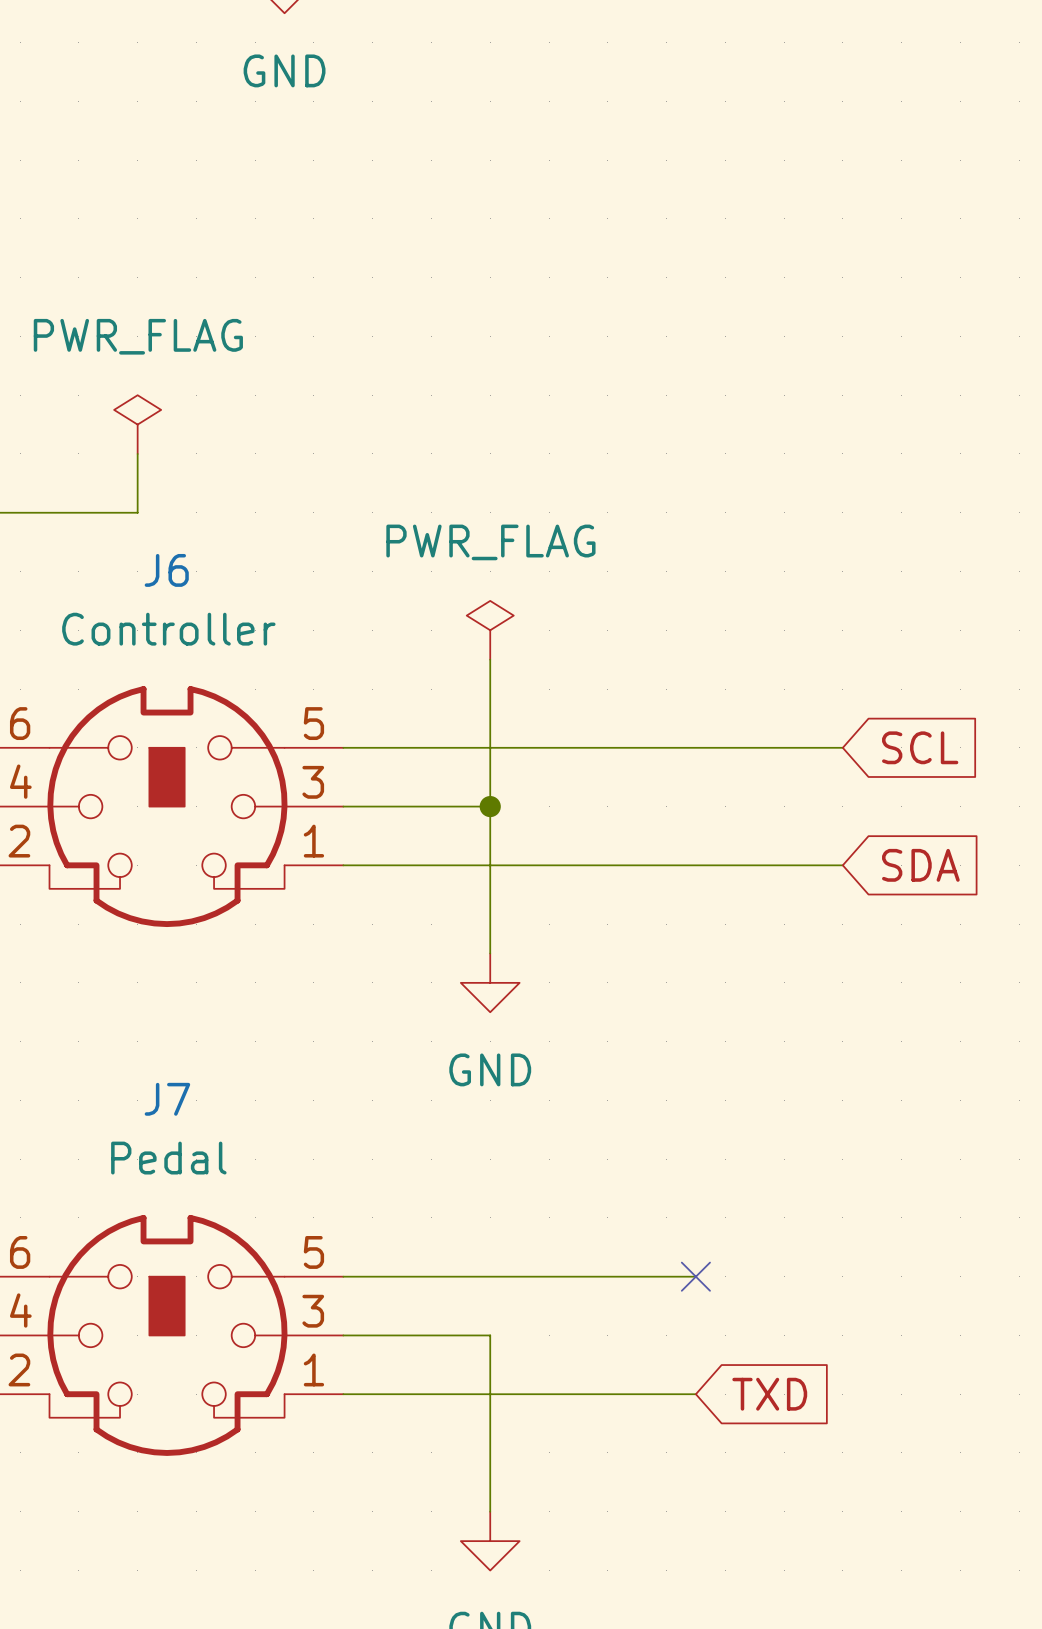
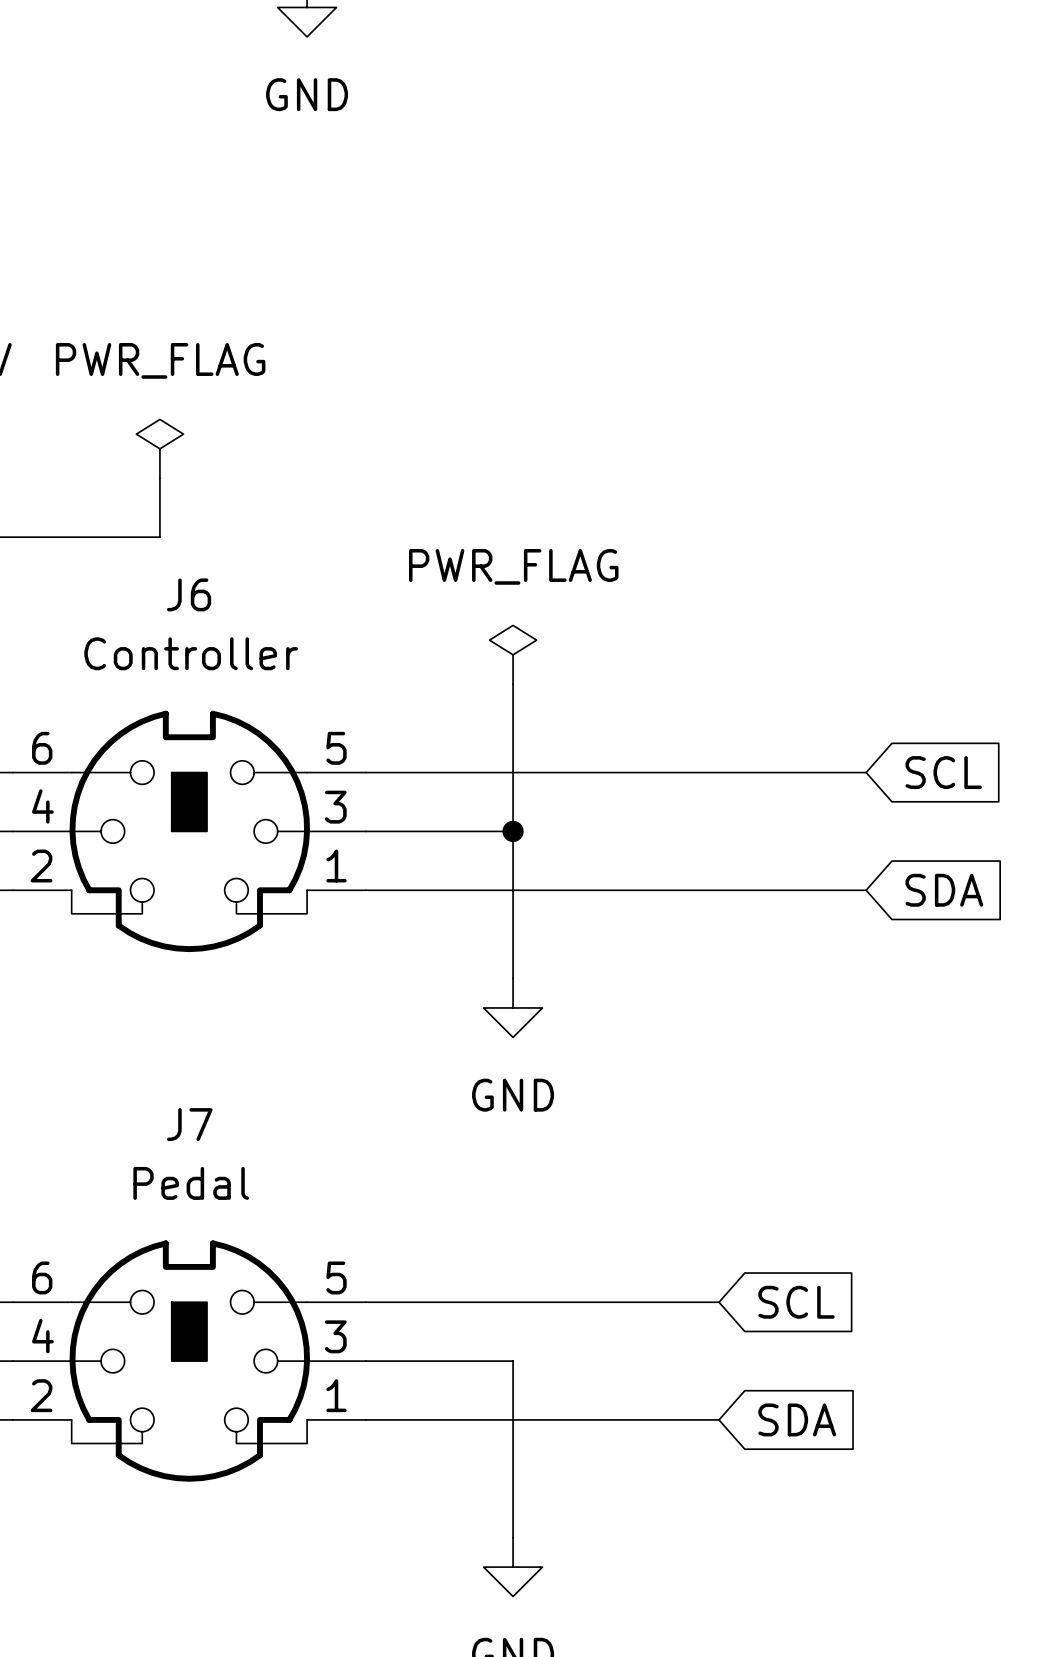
no-connect mark: (695, 1276) -> none
global label: none -> SCL (796, 1302)
global label: TXD (769, 1394) -> SDA (797, 1419)

